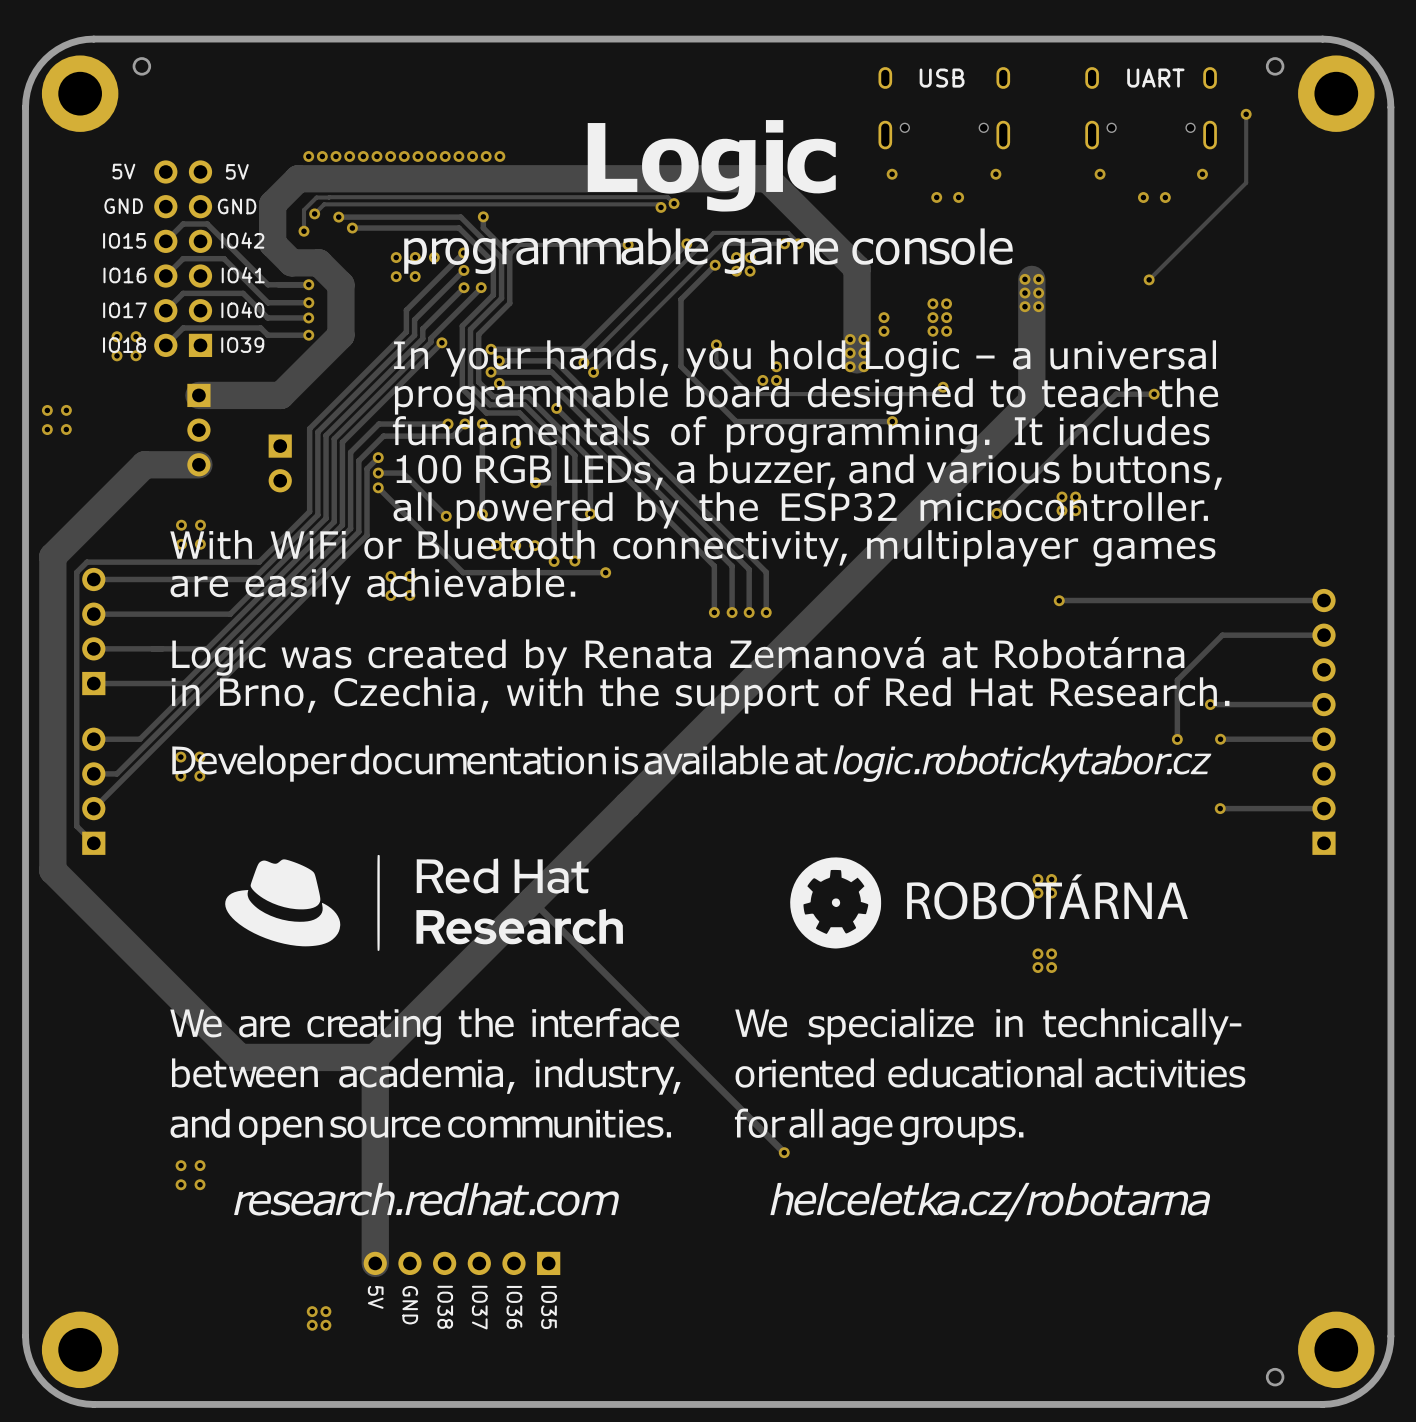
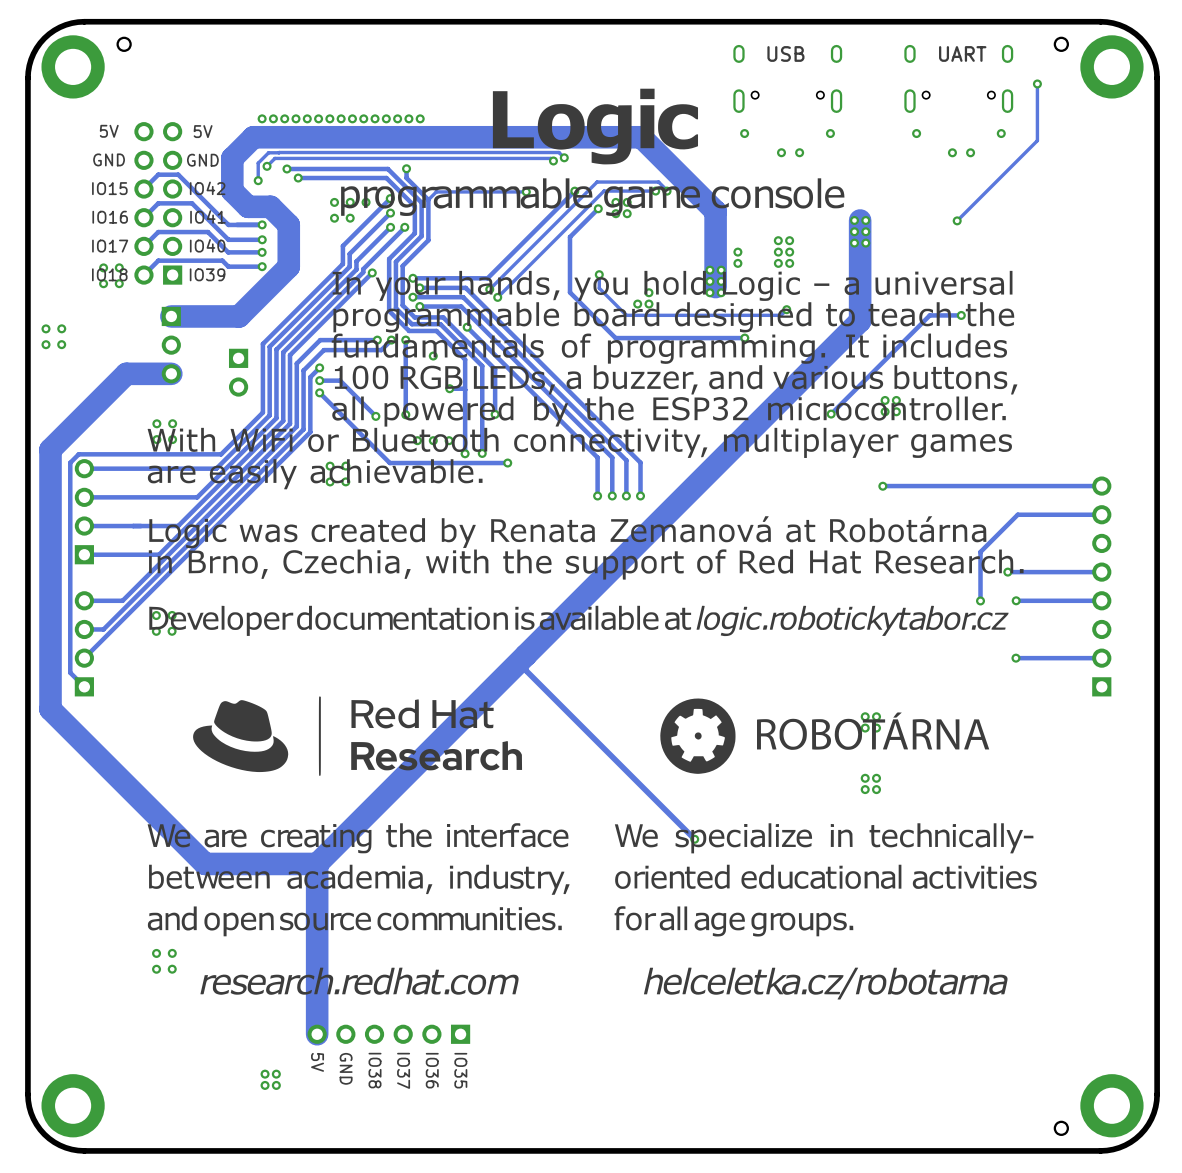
track: none -> (525, 655) (525, 670) (694, 839)
track: (532, 900) (784, 1152) -> none
via: none -> (694, 839)
via: (784, 1152) -> none

